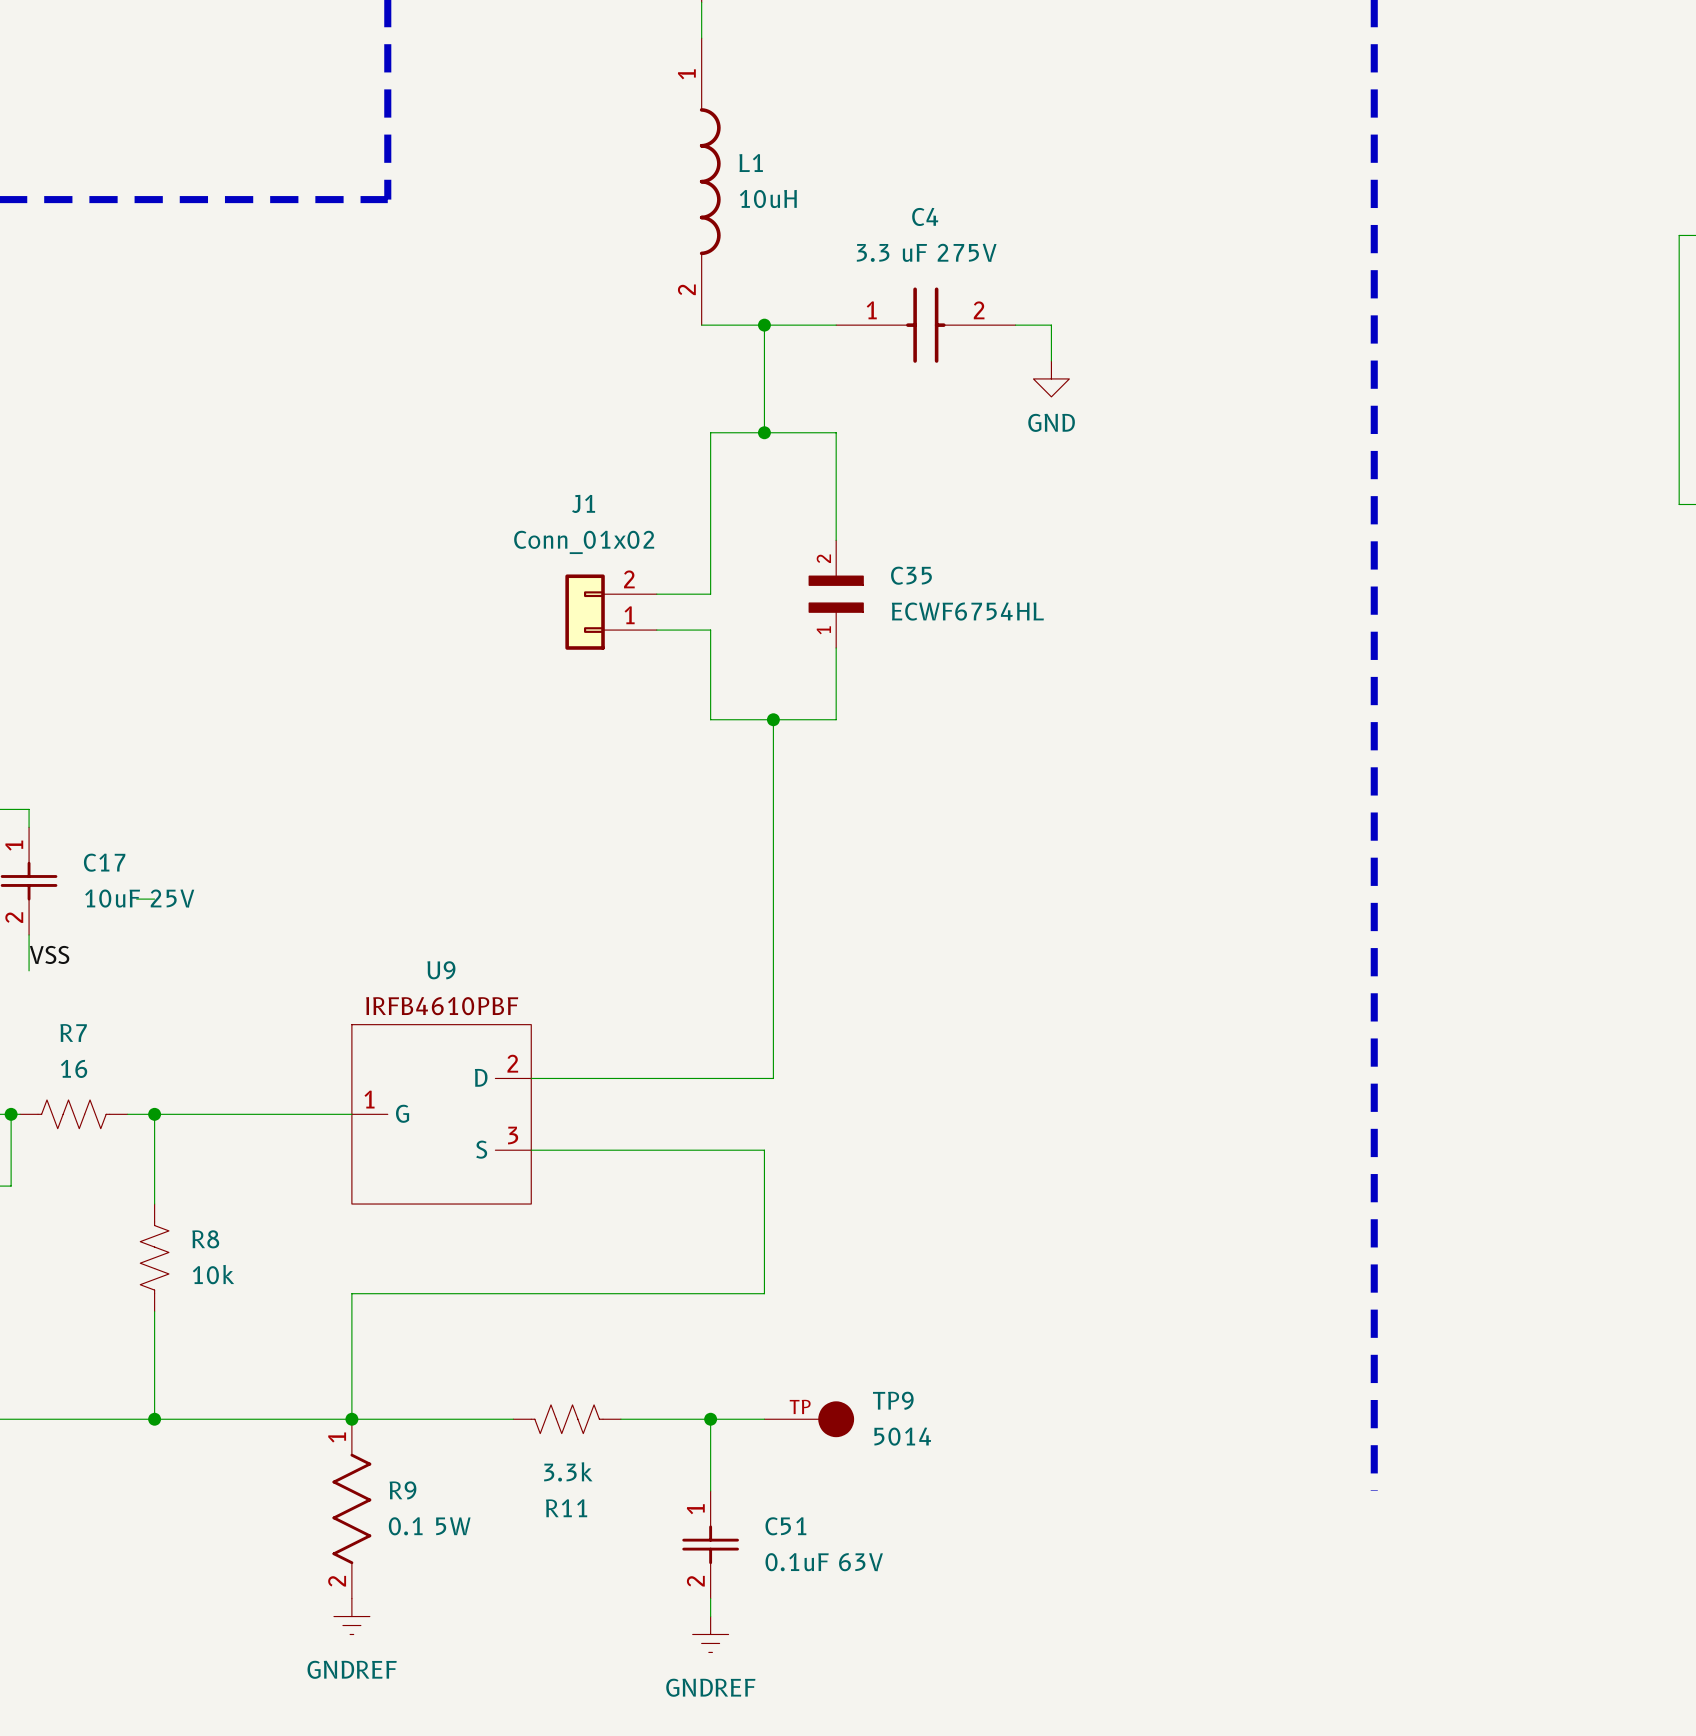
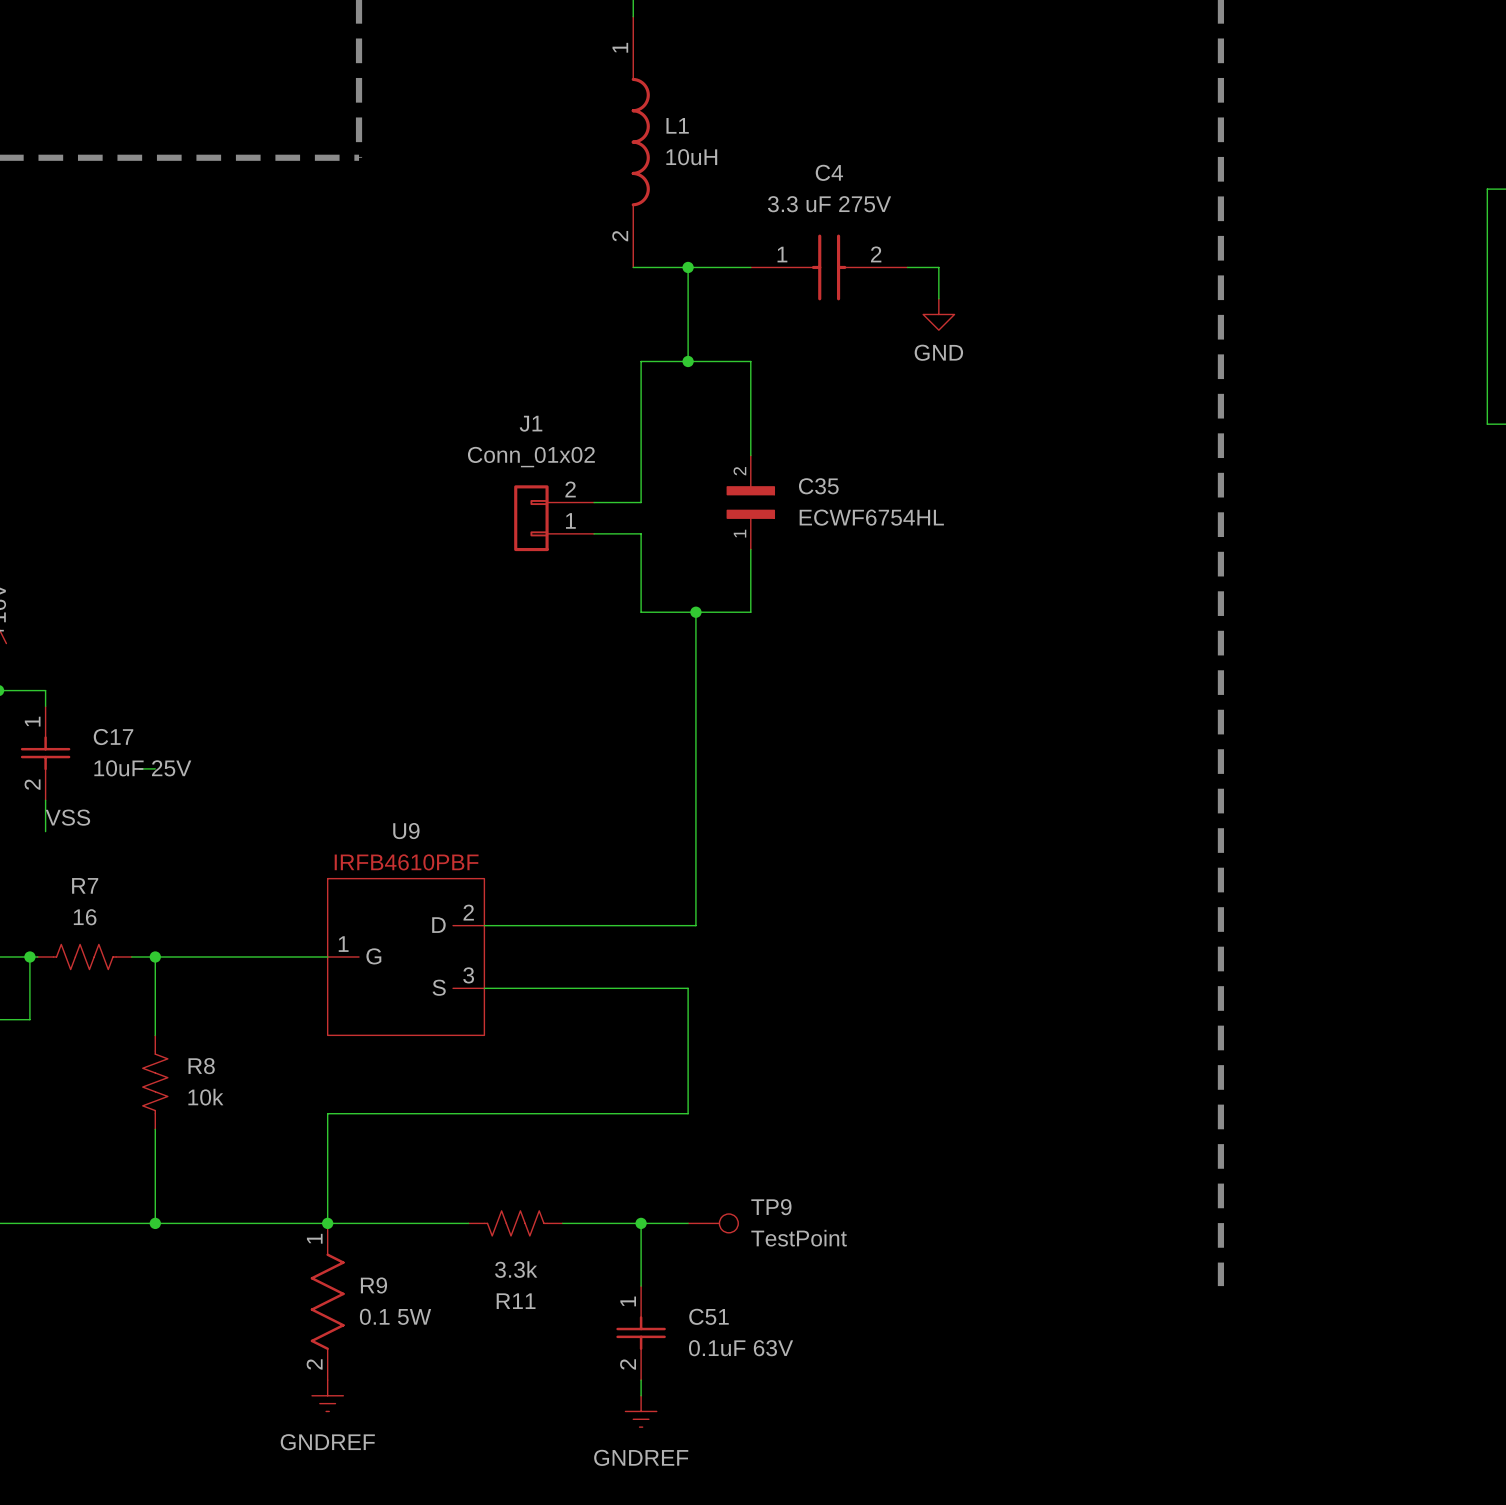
TP9 symbol: [764, 1401, 855, 1438] -> [688, 1214, 739, 1233]
TP9 value: 5014 (902, 1436) -> TestPoint (799, 1238)

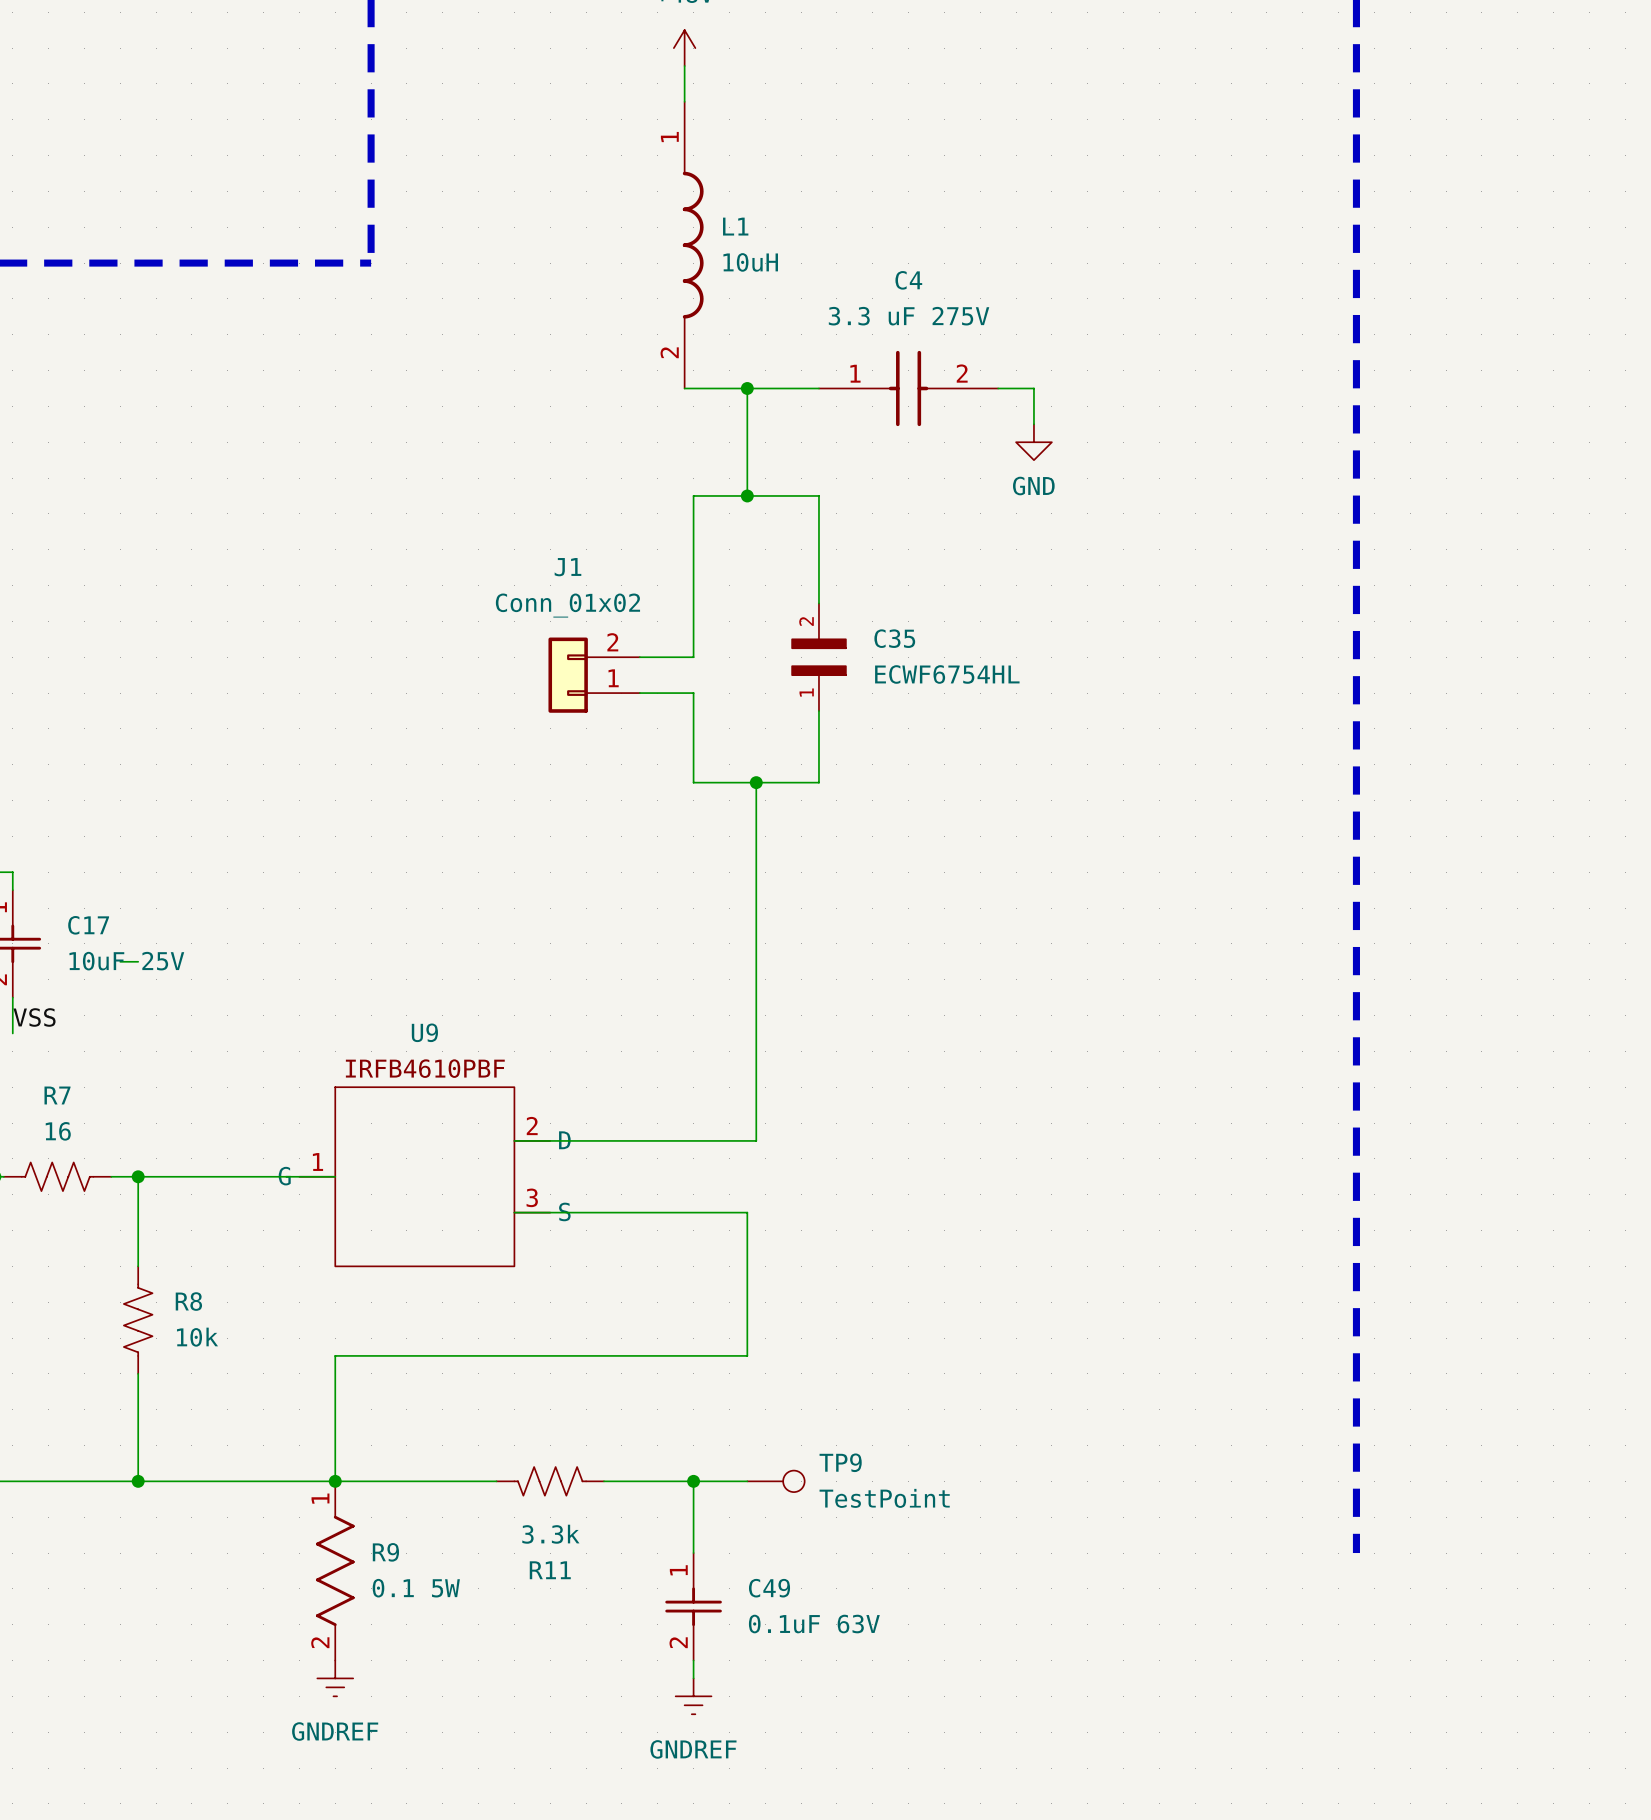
U9 symbol: [327, 878, 485, 1036] -> [299, 1087, 551, 1267]
C51 name: C51 (709, 1316) -> C49 (769, 1588)

